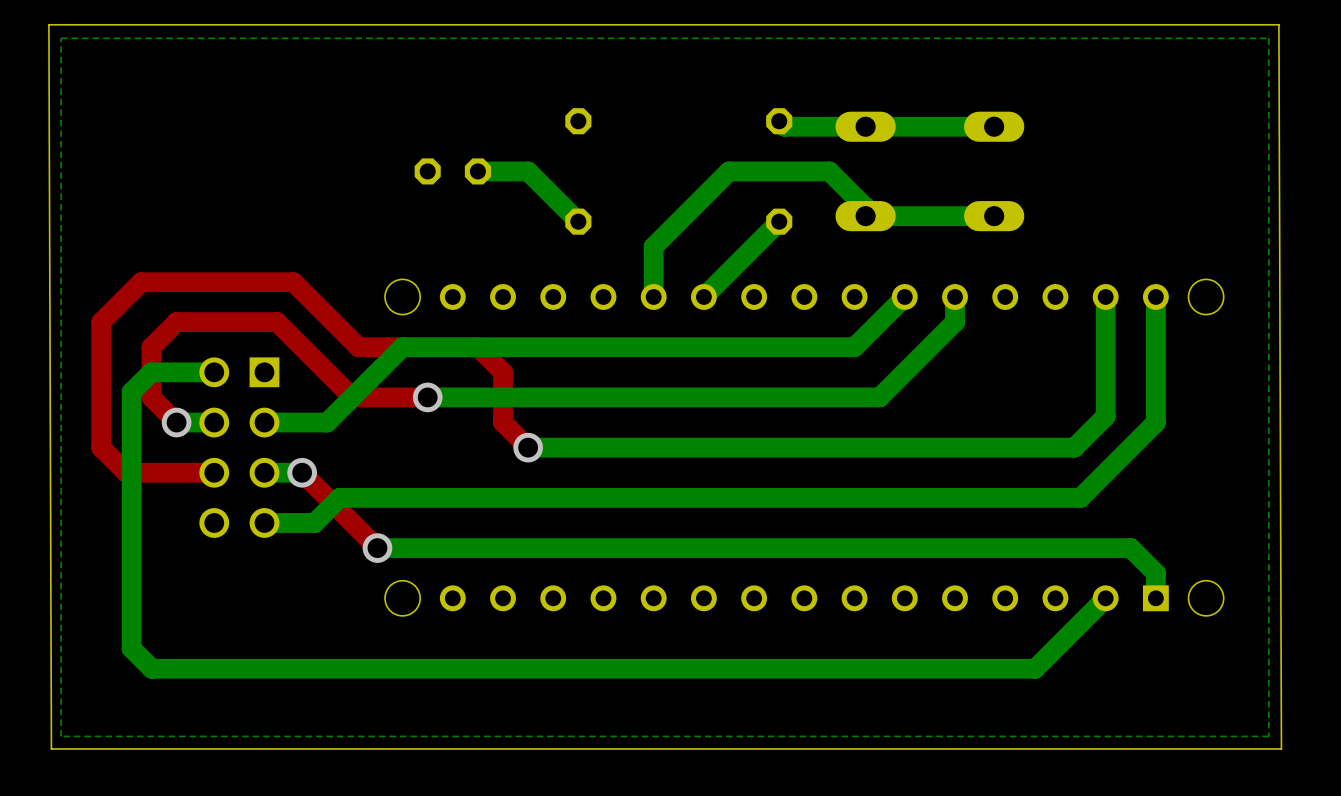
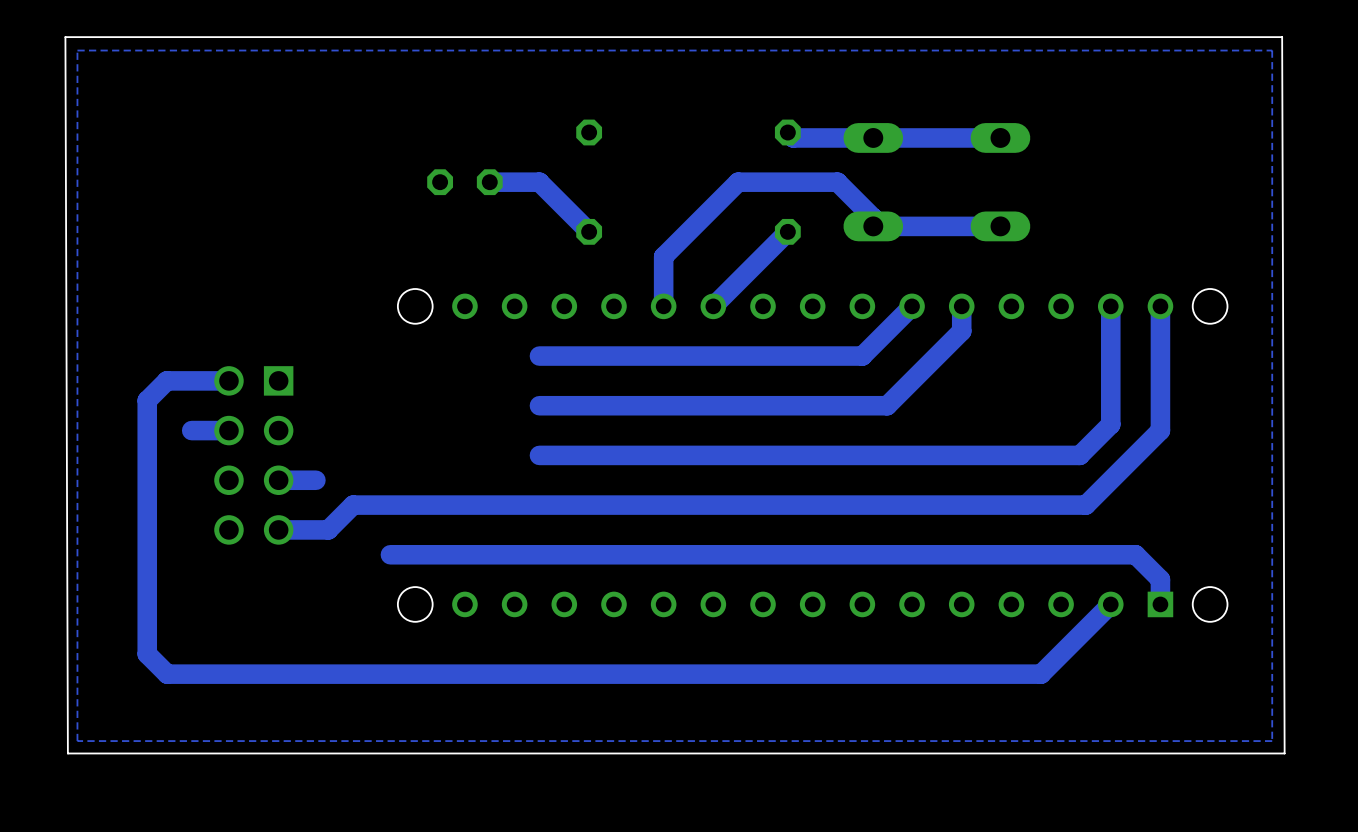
bottom track: (528, 347) (402, 347) (327, 422) (264, 422) -> none
top track: (427, 397) (352, 397) (277, 322) (176, 322) (151, 347) (151, 397) (176, 422) -> none
via: (427, 397) -> none
bottom track: (528, 397) (427, 397) -> none
via: (176, 422) -> none
top track: (528, 447) (503, 422) (503, 372) (477, 347) (358, 347) (293, 282) (141, 282) (101, 322) (101, 447) (126, 472) (214, 472) -> none
via: (528, 447) -> none
top track: (302, 472) (377, 548) -> none
via: (302, 472) -> none
via: (377, 548) -> none

